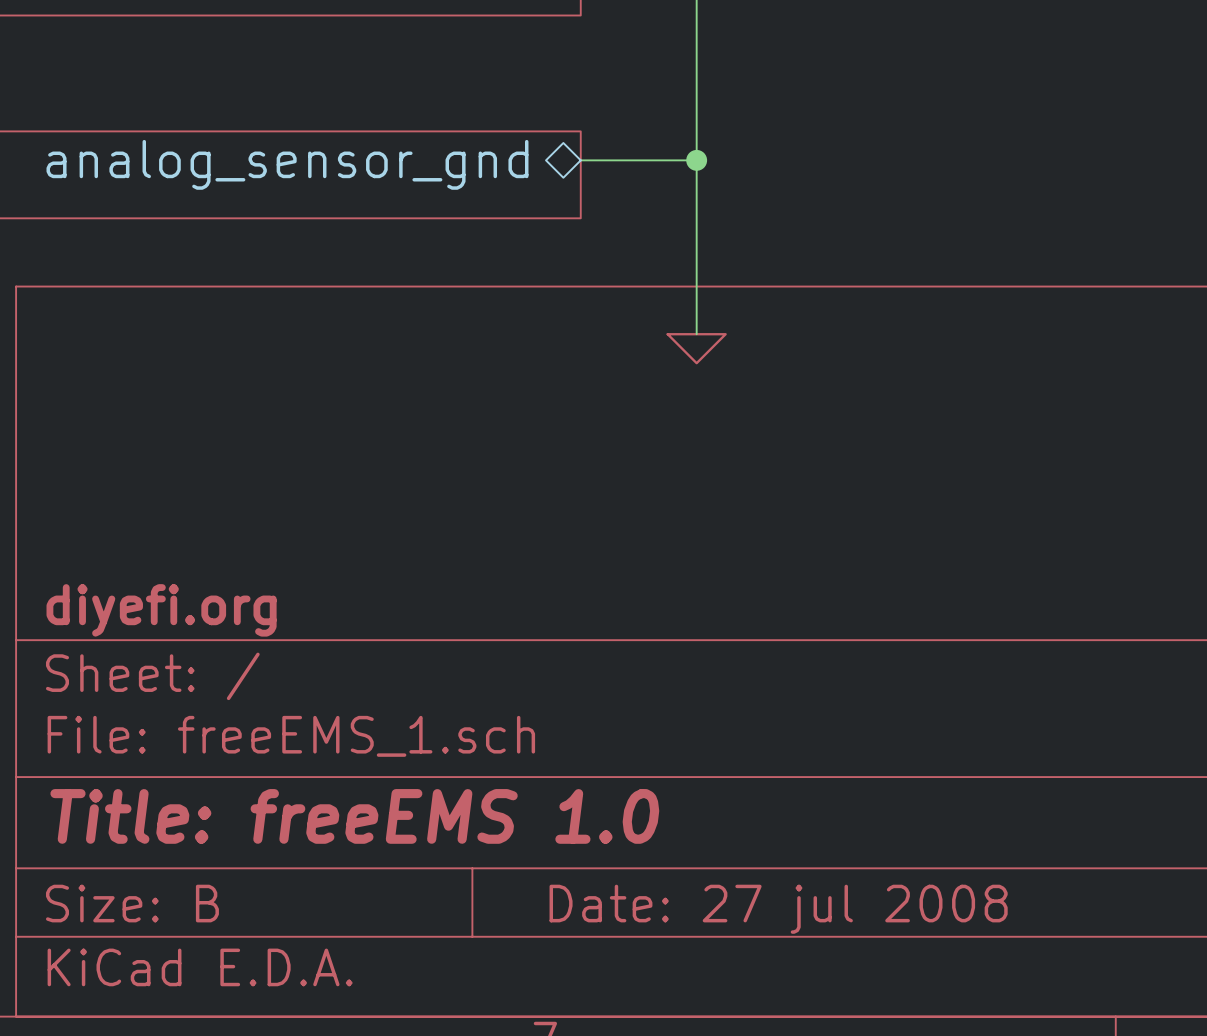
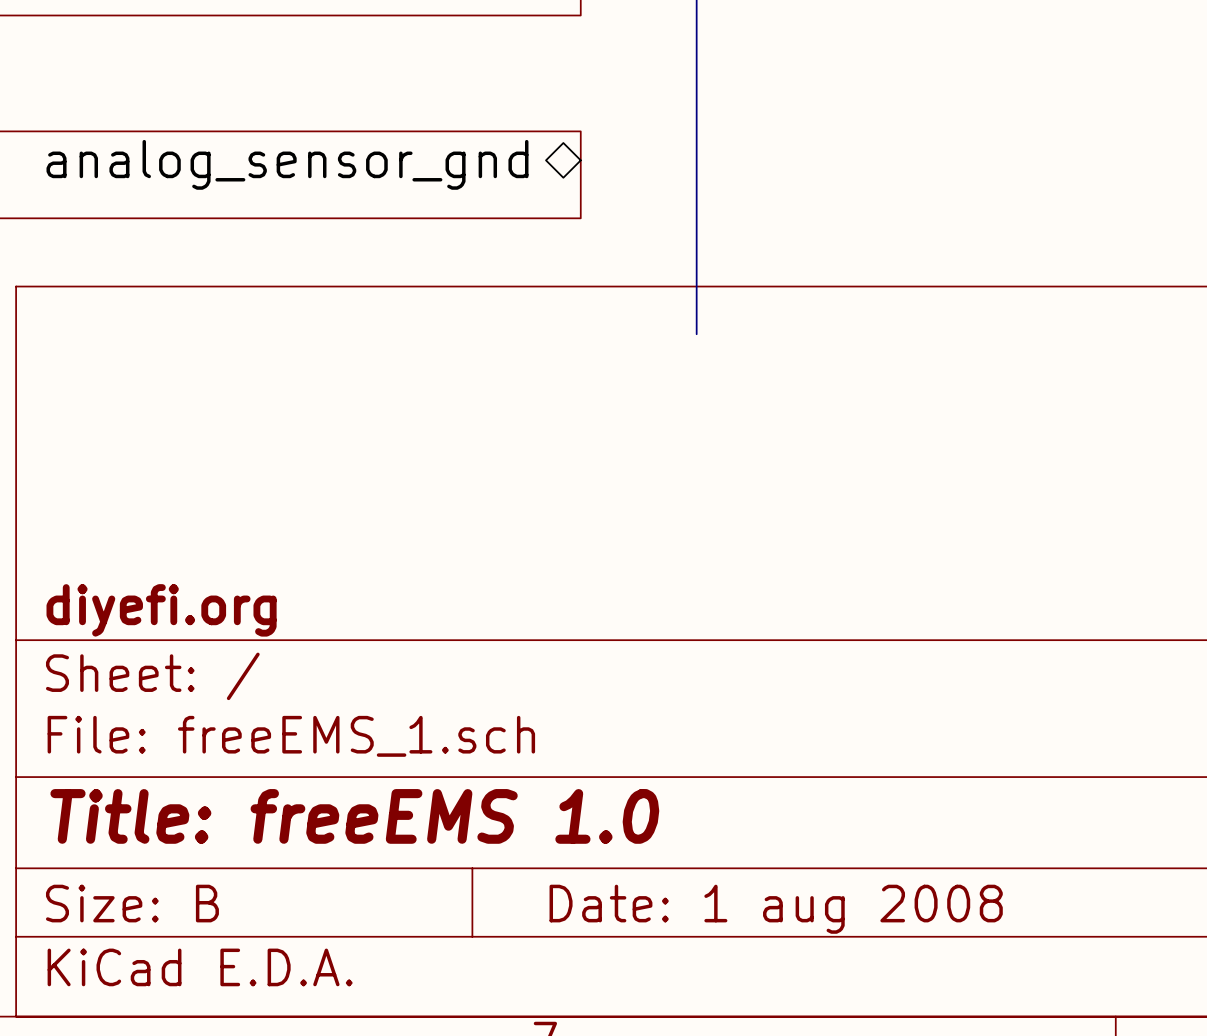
wire: (580, 160) (696, 160) -> none
junction: (696, 160) -> none
power symbol: (696, 348) -> none
title block: Date: 27 jul 2008 (778, 909) -> Date: 1 aug 2008 (776, 909)

